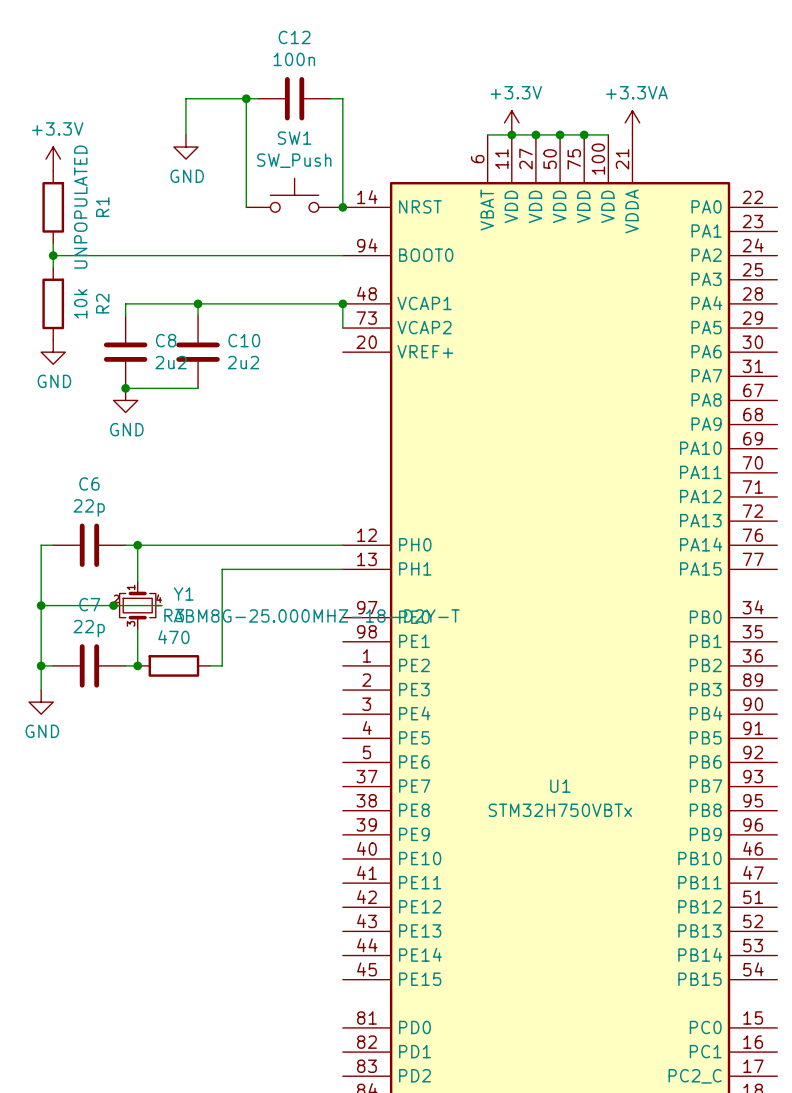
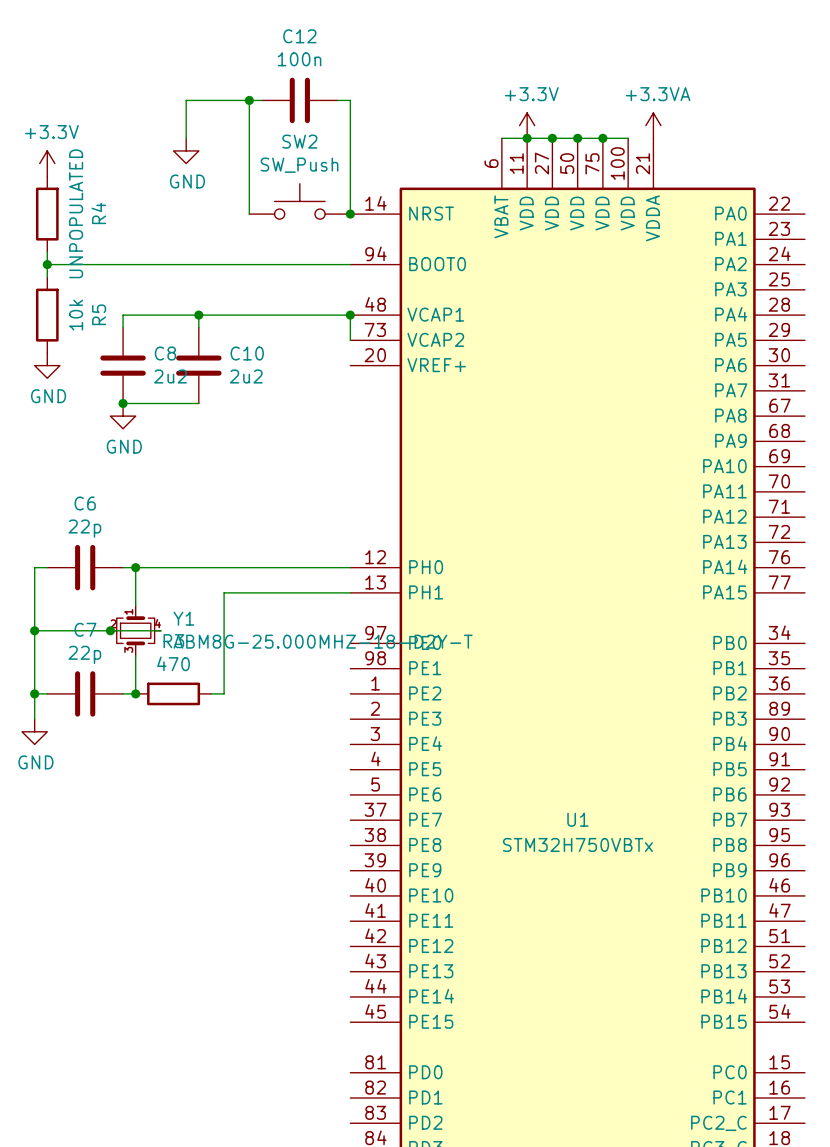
SW1 name: SW1 (294, 138) -> SW2 (299, 141)
R1 name: R1 (102, 207) -> R4 (98, 213)
R2 name: R2 (102, 303) -> R5 (99, 314)

